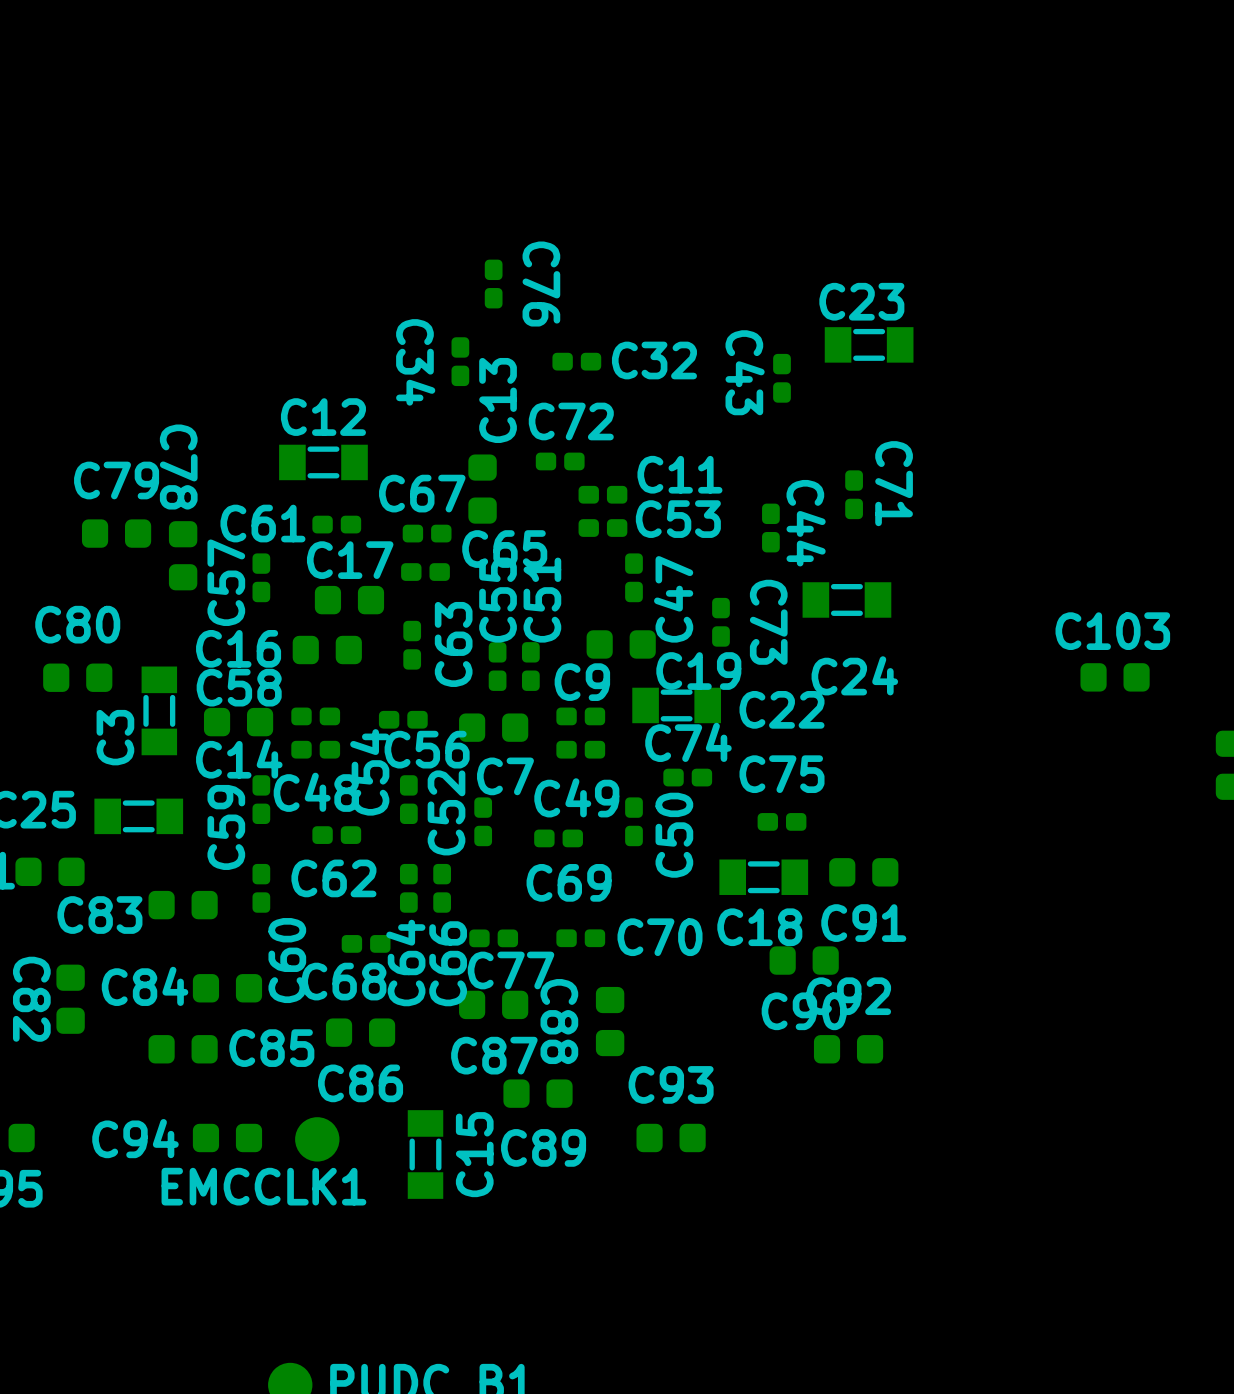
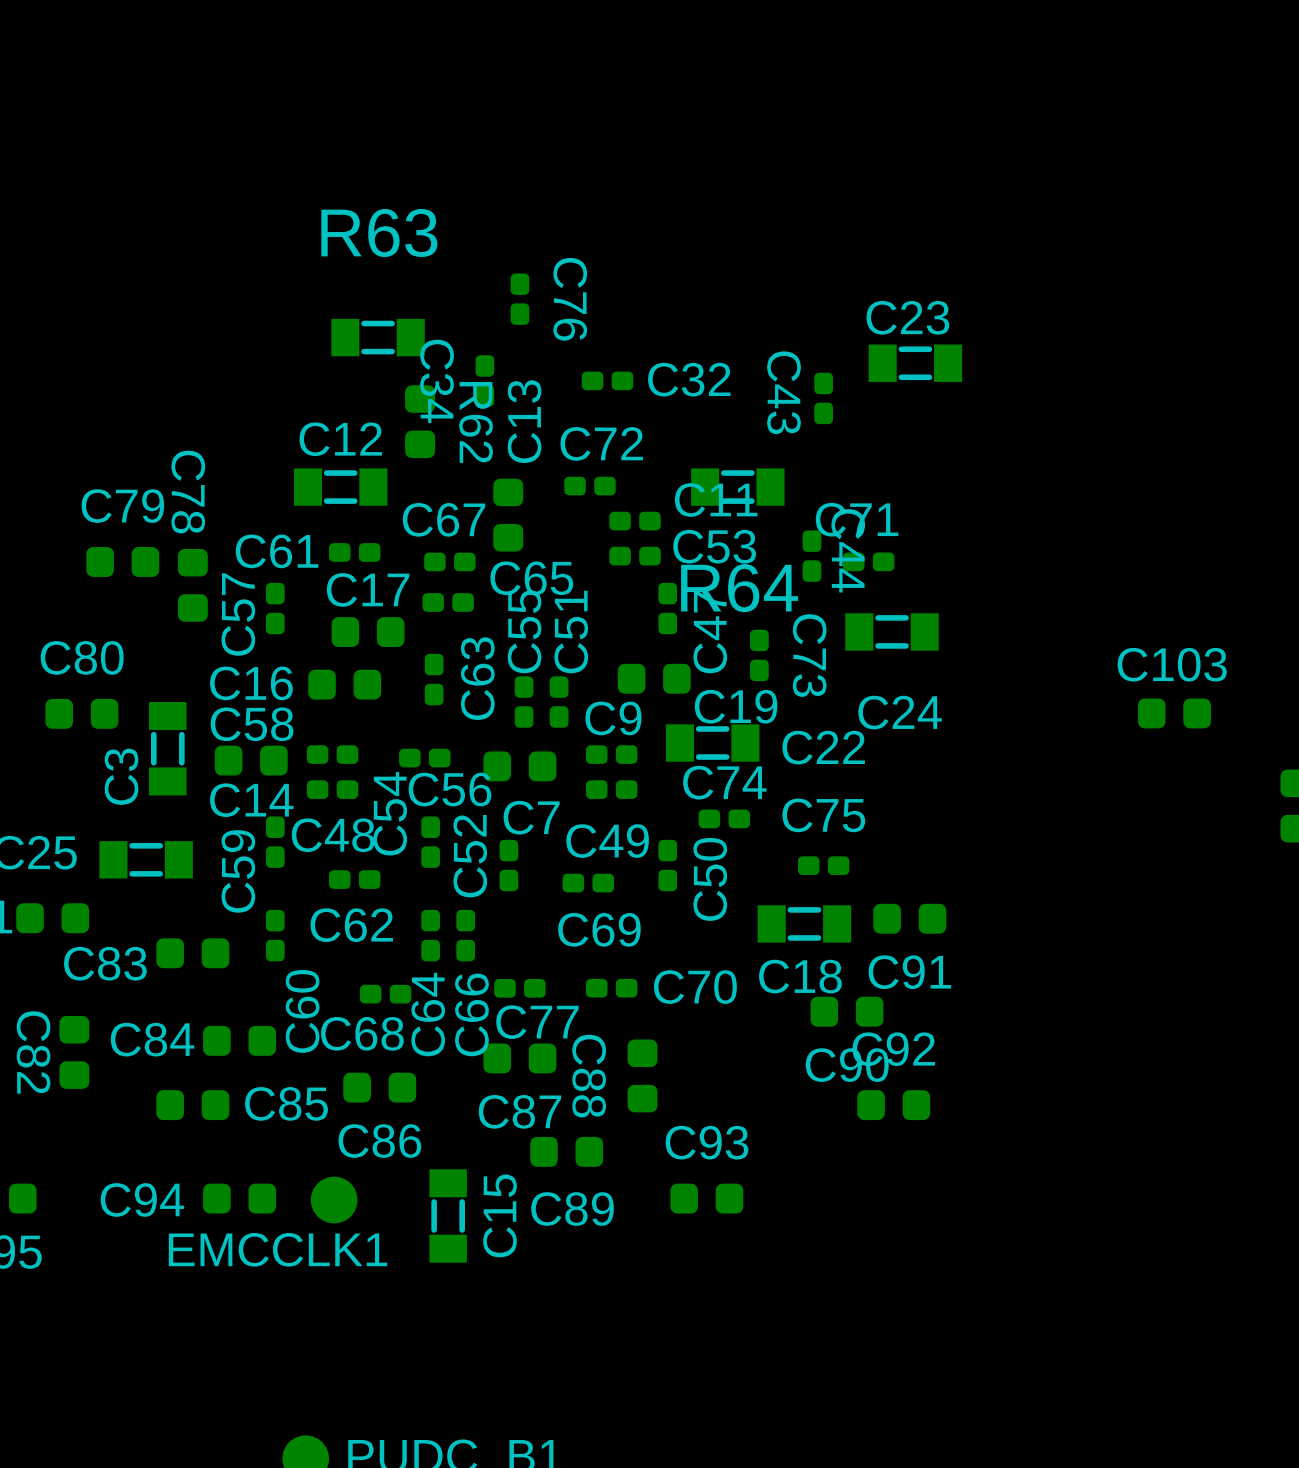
R63: none -> (378, 337)
R62: none -> (420, 421)
R64: none -> (737, 487)
C71 rotation: 0° (854, 494) -> 90° clockwise (868, 561)
C71 position: (854, 494) -> (868, 561)

